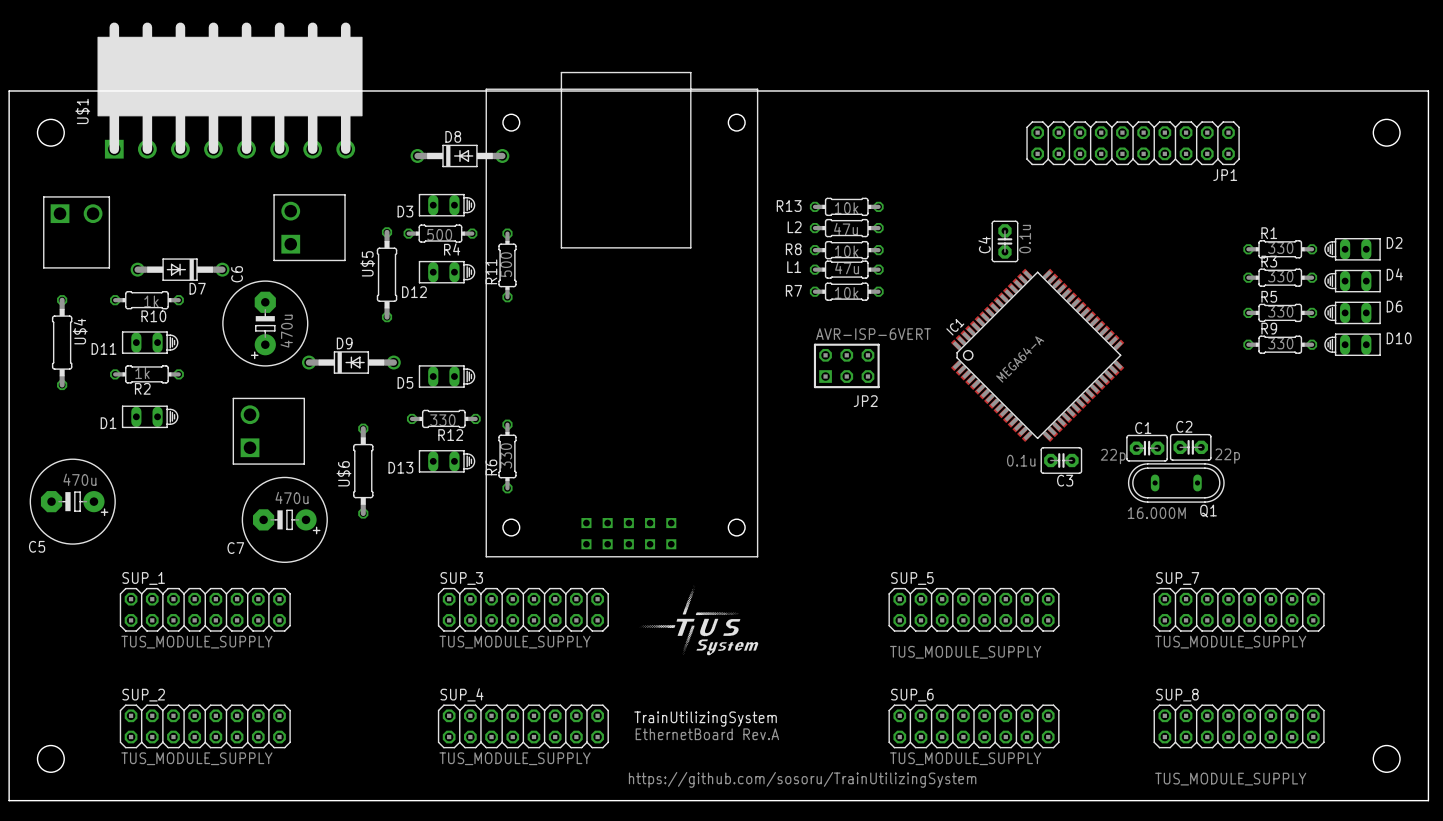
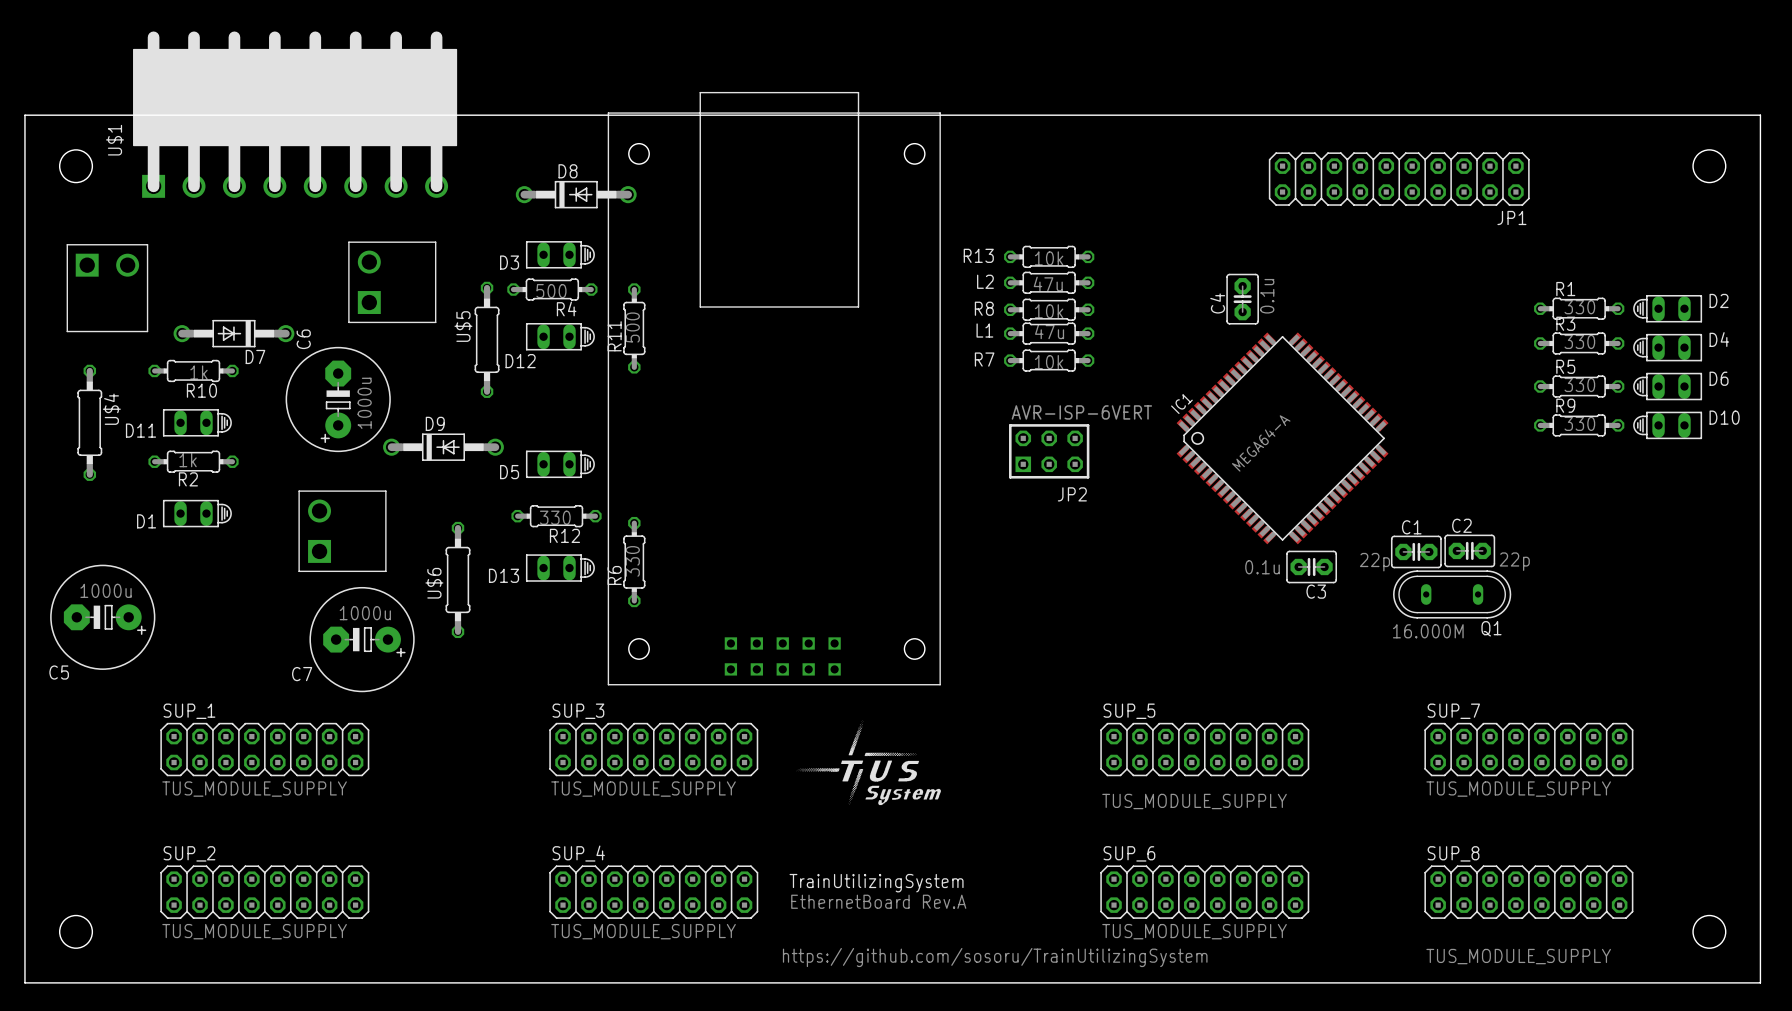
C6 value: 470u (286, 331) -> 1000u (364, 403)
C5 value: 470u (79, 479) -> 1000u (106, 590)
C7 value: 470u (292, 497) -> 1000u (365, 613)

